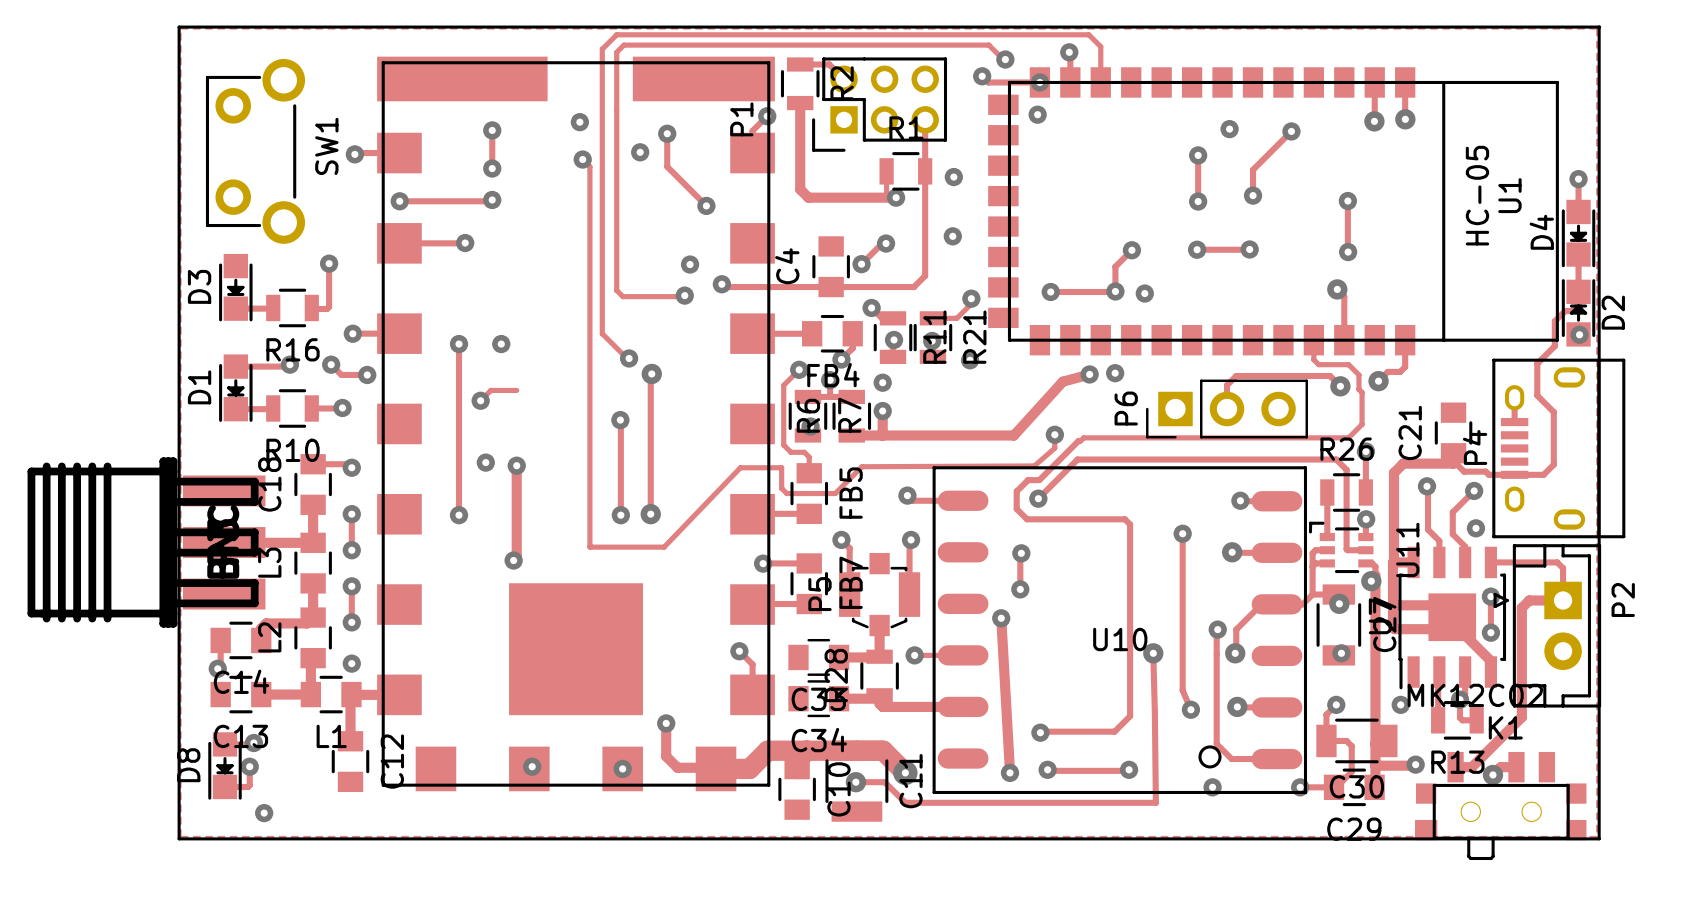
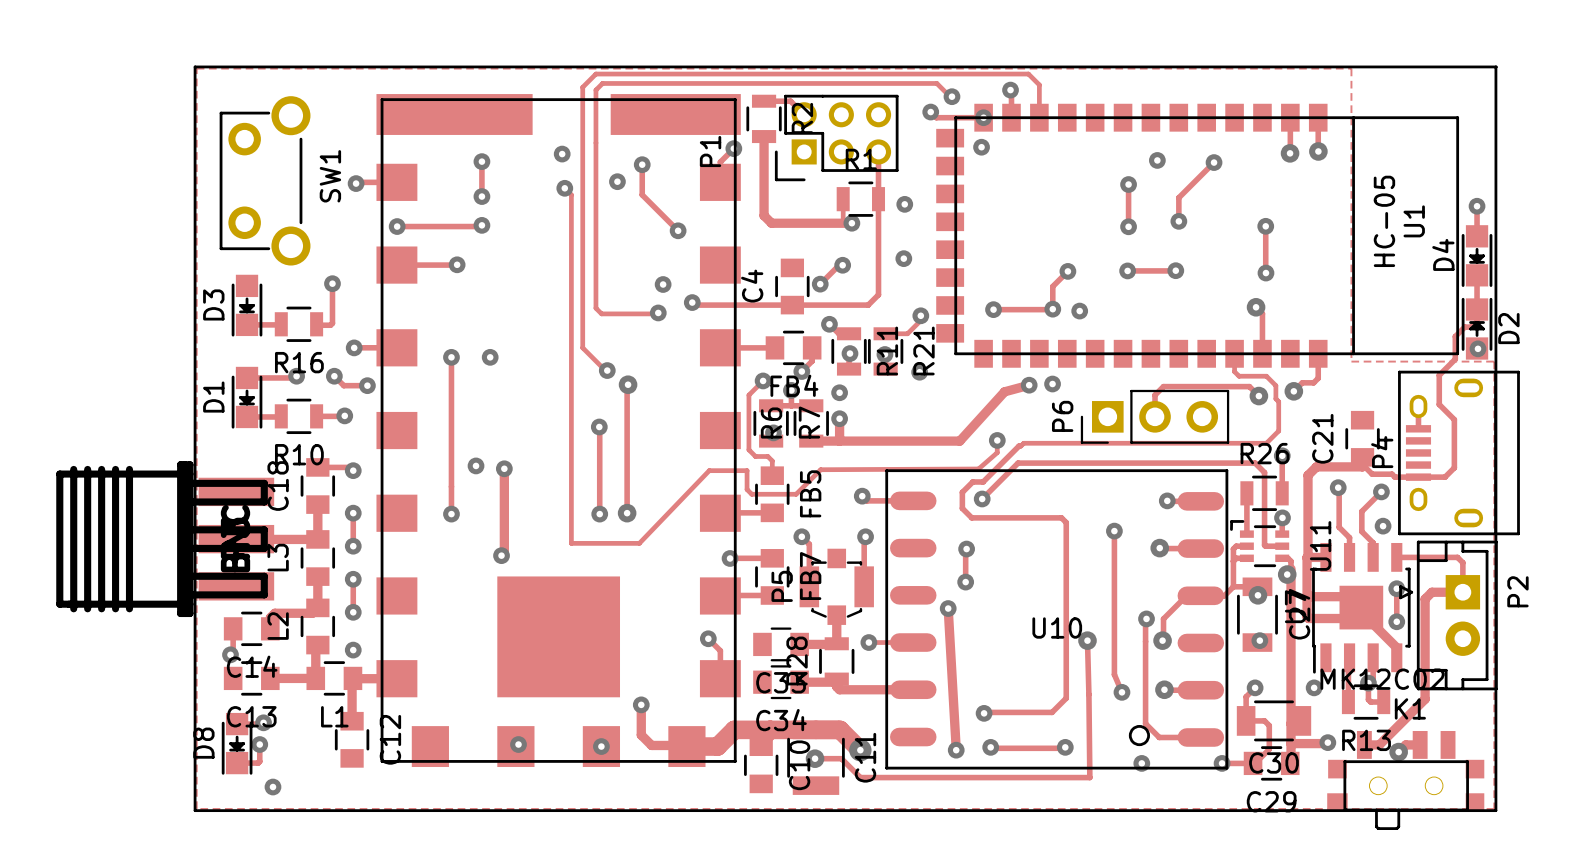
zone outline: (180, 28) (180, 836) (1597, 836) (1597, 28) (180, 28) -> (196, 68) (196, 808) (1494, 808) (1494, 361) (1351, 361) (1351, 68) (196, 68)
track: (516, 390) (490, 390) (480, 400) -> none
via: (480, 400) -> none

